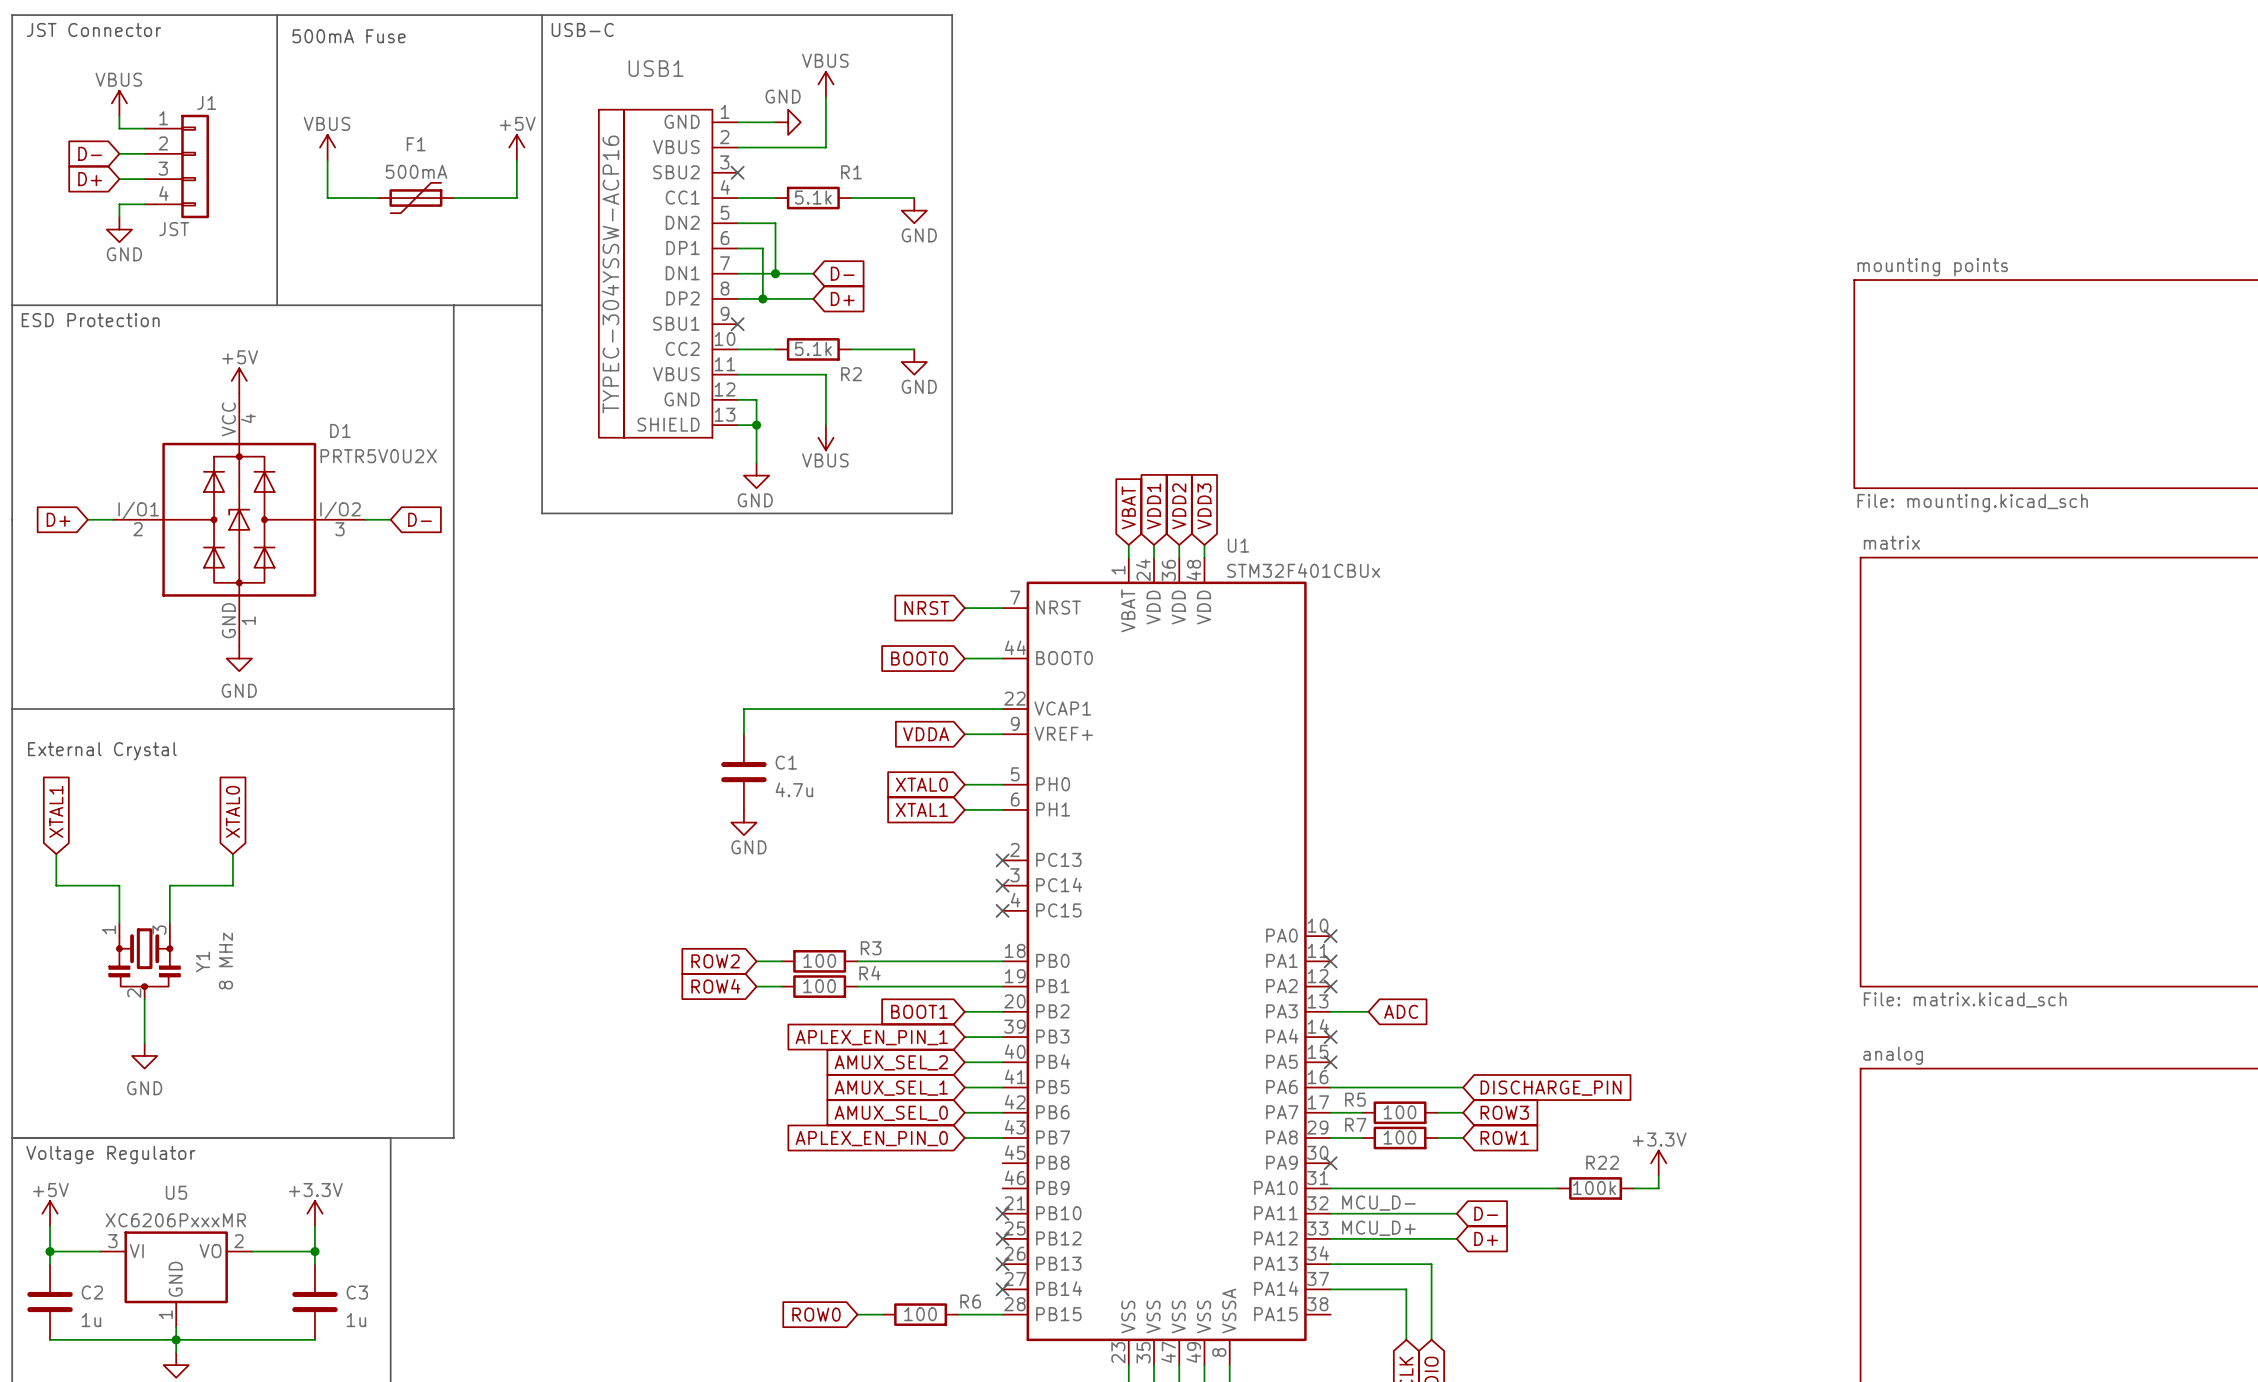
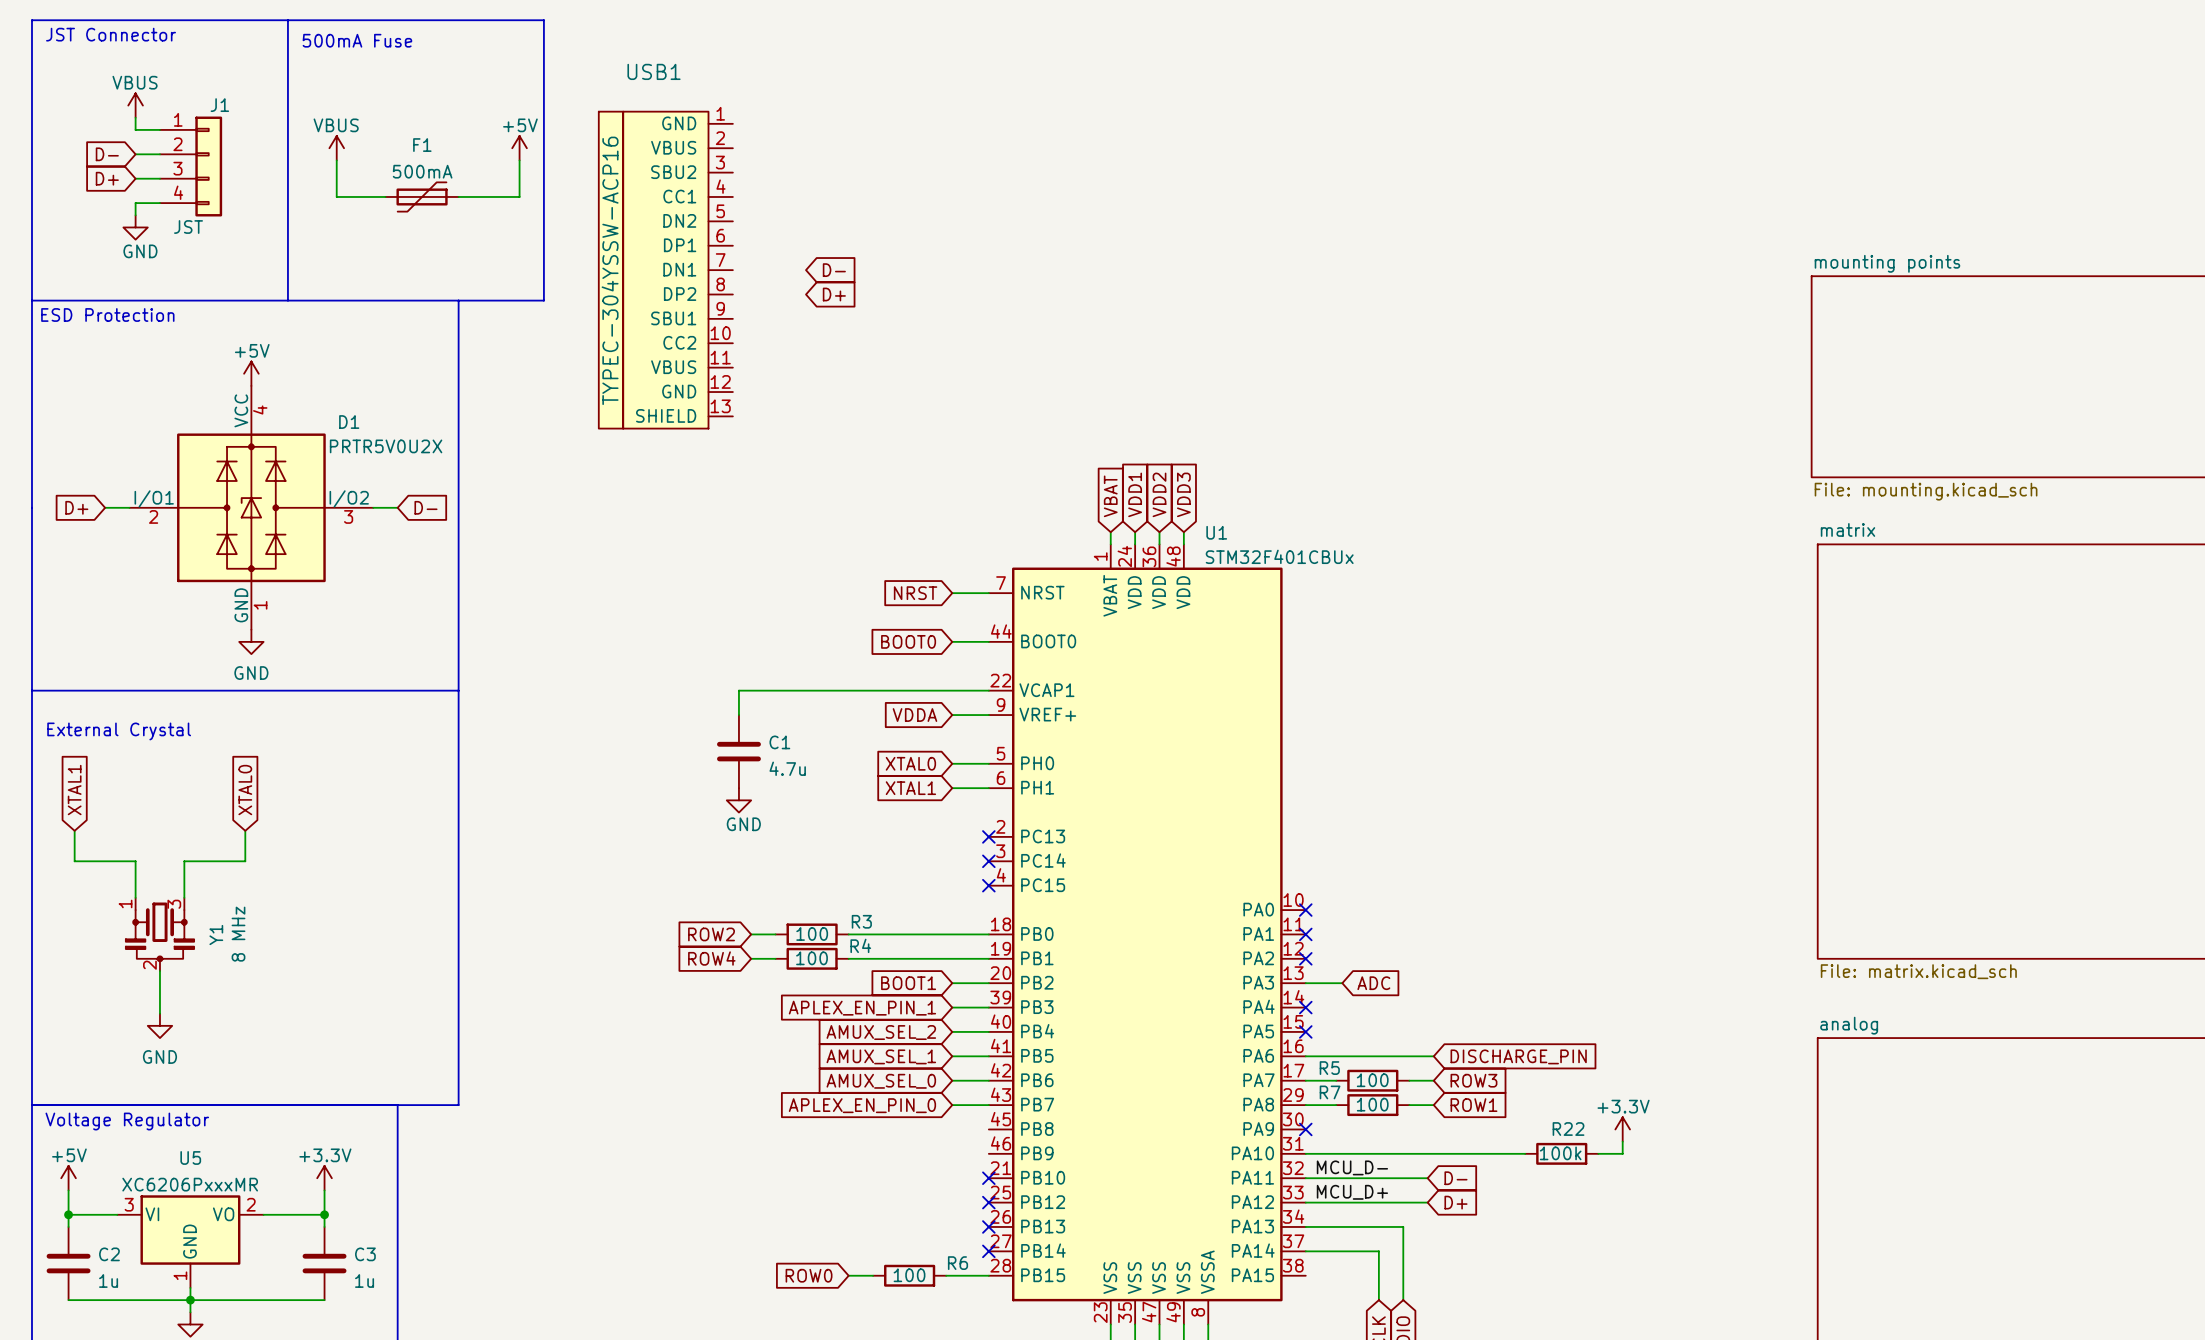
line: (542, 15) (952, 15) (952, 513) (542, 513) (542, 305) -> none
text: USB-C (582, 29) -> none
power symbol: VBUS (825, 84) -> none
wire: (825, 97) (825, 147) (737, 147) -> none
wire: (737, 122) (775, 122) -> none
power symbol: GND (788, 122) -> none
no-connect mark: (737, 172) -> none
wire: (737, 198) (775, 198) -> none
R1: 5.1k (813, 198) -> none
wire: (851, 198) (914, 198) -> none
power symbol: GND (914, 210) -> none
wire: (737, 223) (775, 223) (775, 273) -> none
wire: (737, 248) (762, 248) (762, 298) -> none
wire: (737, 273) (813, 273) -> none
junction: (775, 273) -> none
wire: (737, 298) (813, 298) -> none
junction: (762, 298) -> none
no-connect mark: (737, 324) -> none
wire: (737, 349) (775, 349) -> none
R2: 5.1k (813, 349) -> none
wire: (851, 349) (914, 349) -> none
power symbol: GND (914, 362) -> none
wire: (737, 374) (825, 374) (825, 425) -> none
wire: (737, 399) (756, 399) (756, 462) -> none
wire: (737, 425) (756, 425) -> none
junction: (756, 425) -> none
power symbol: VBUS (825, 437) -> none
power symbol: GND (756, 475) -> none

